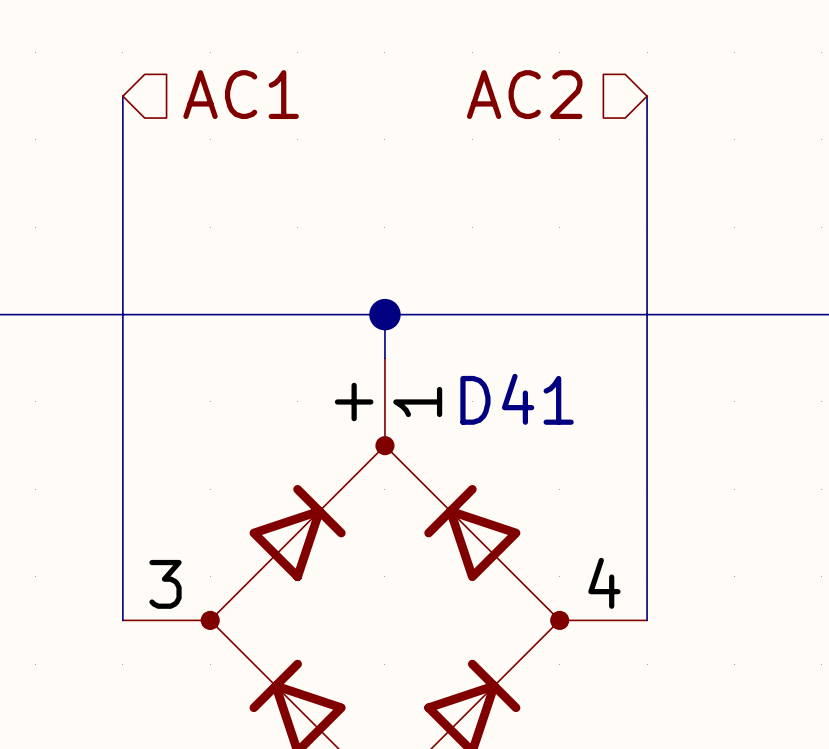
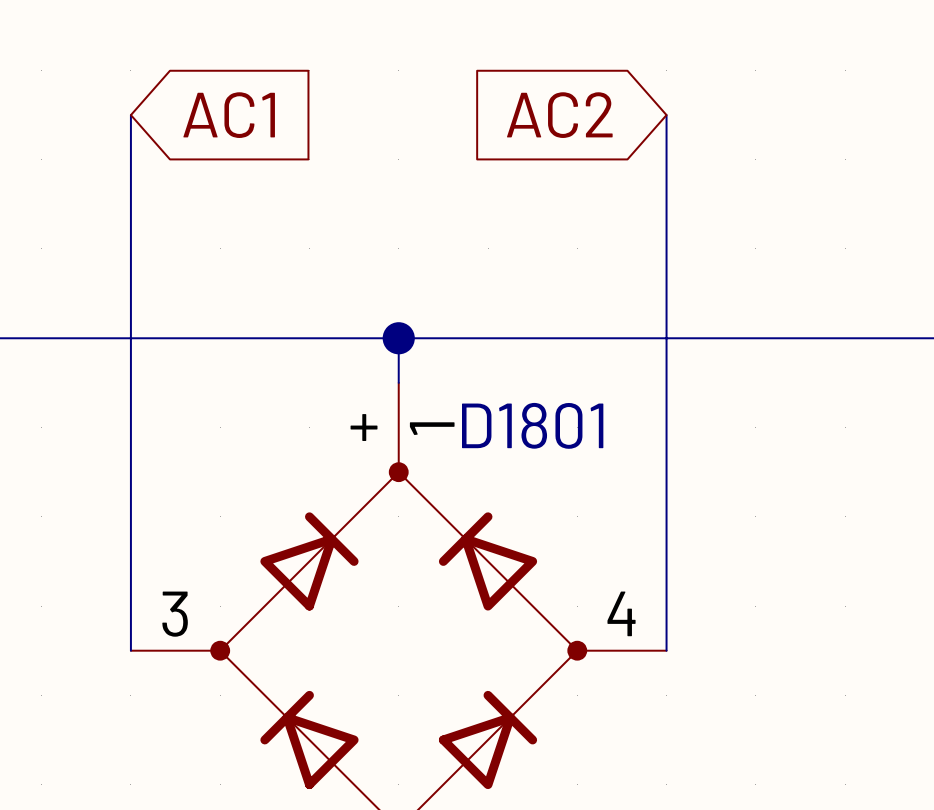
hierarchical label: AC1 (241, 94) -> none
hierarchical label: AC2 (524, 94) -> none
global label: none -> AC1 (229, 115)
global label: none -> AC2 (559, 115)
D41 name: D41 (517, 399) -> D1801 (532, 425)

